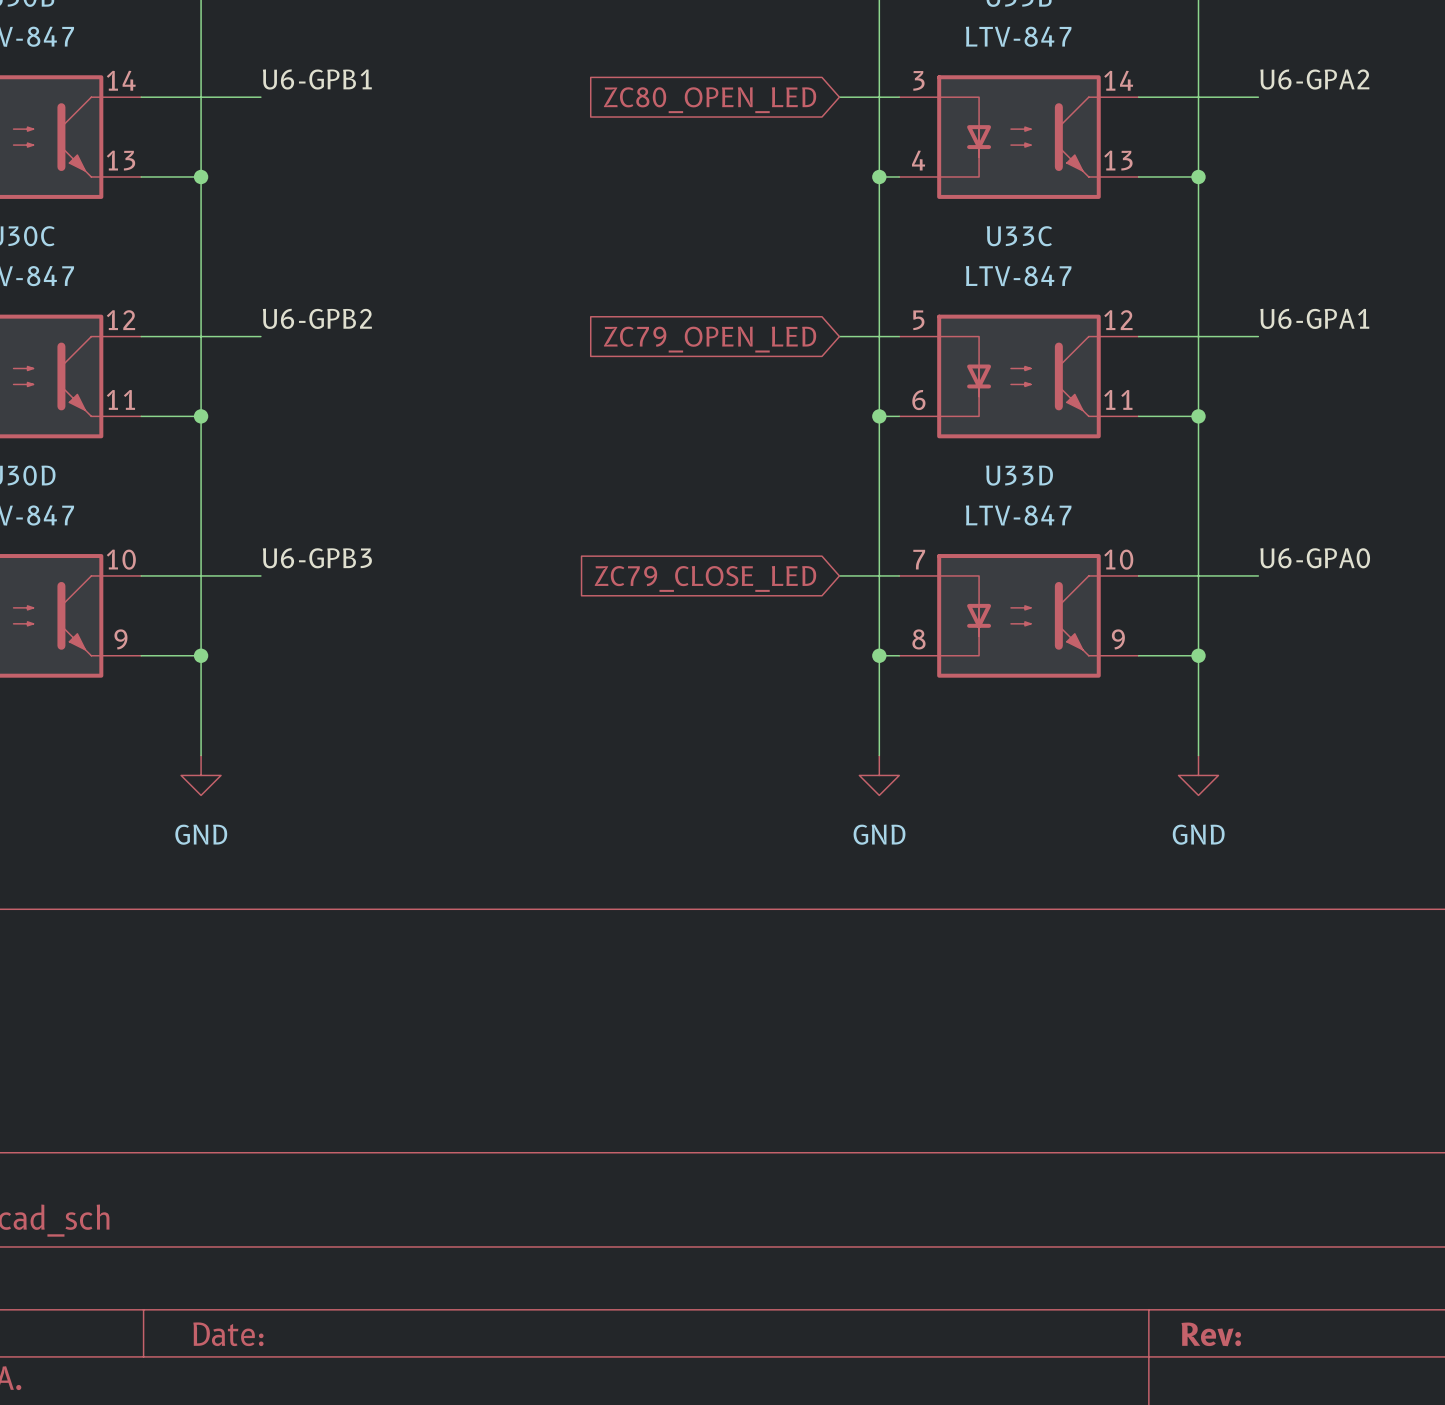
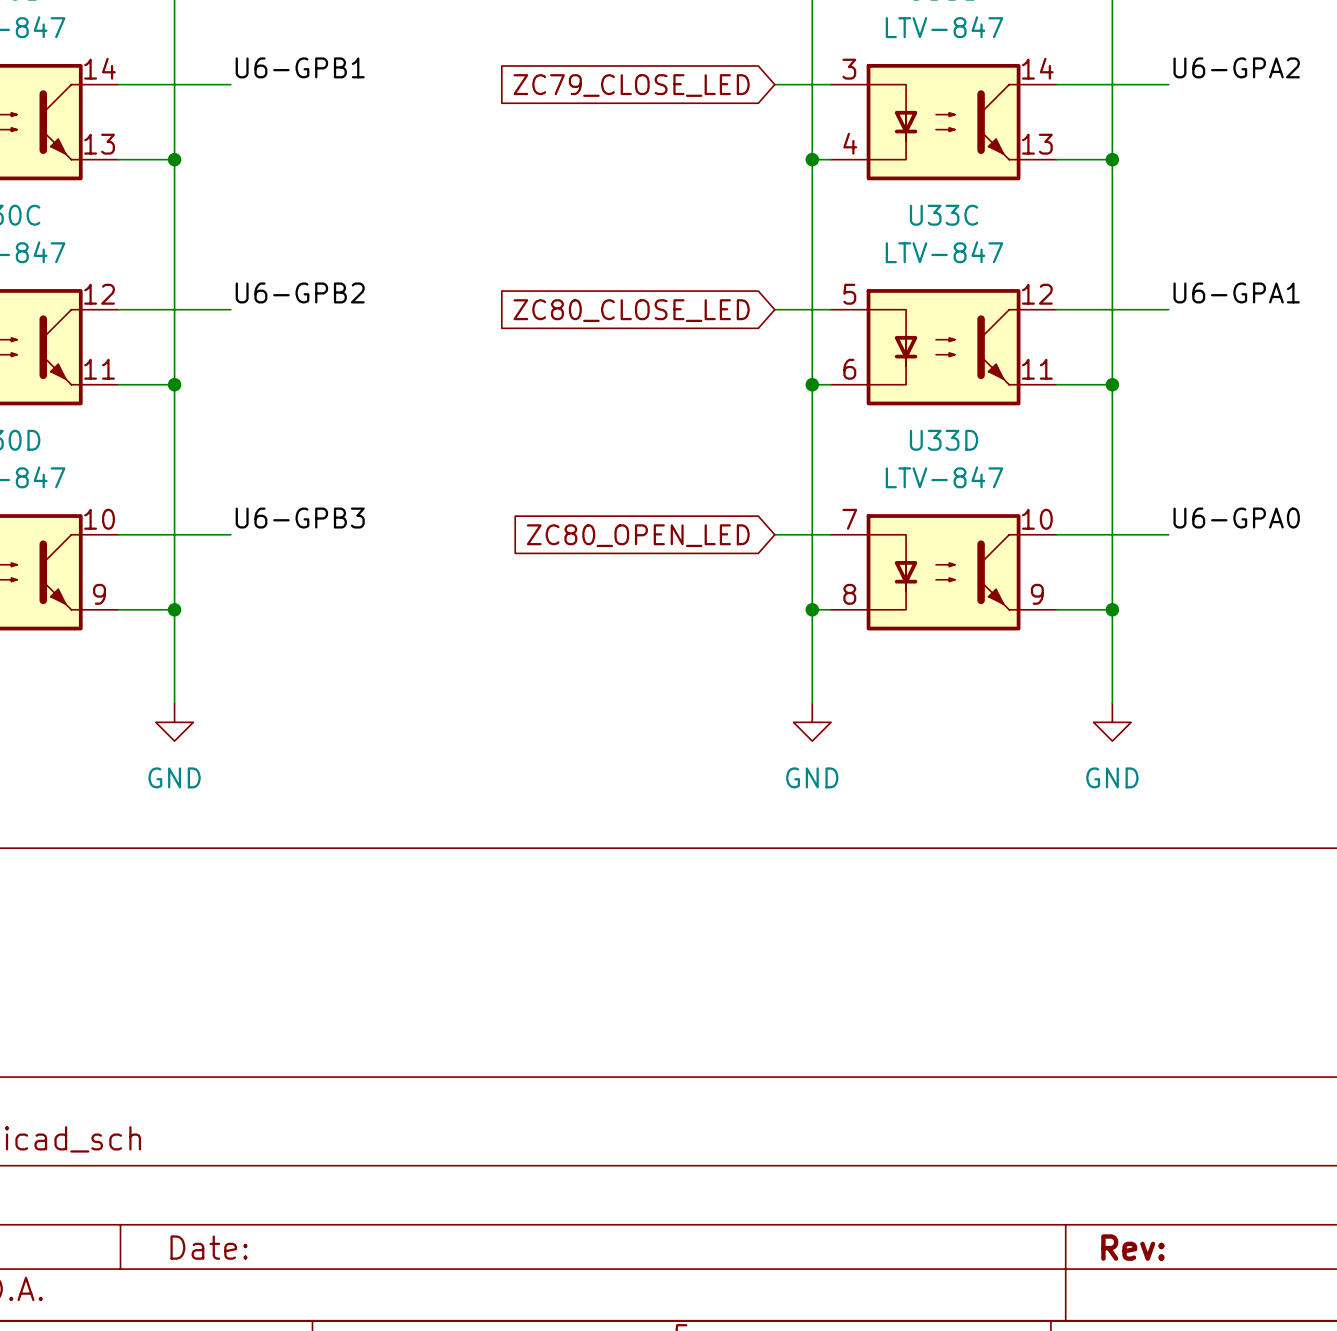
global label: ZC80_OPEN_LED (710, 100) -> ZC79_CLOSE_LED (631, 85)
global label: ZC79_OPEN_LED (710, 339) -> ZC80_CLOSE_LED (631, 310)
global label: ZC79_CLOSE_LED (705, 578) -> ZC80_OPEN_LED (638, 535)

